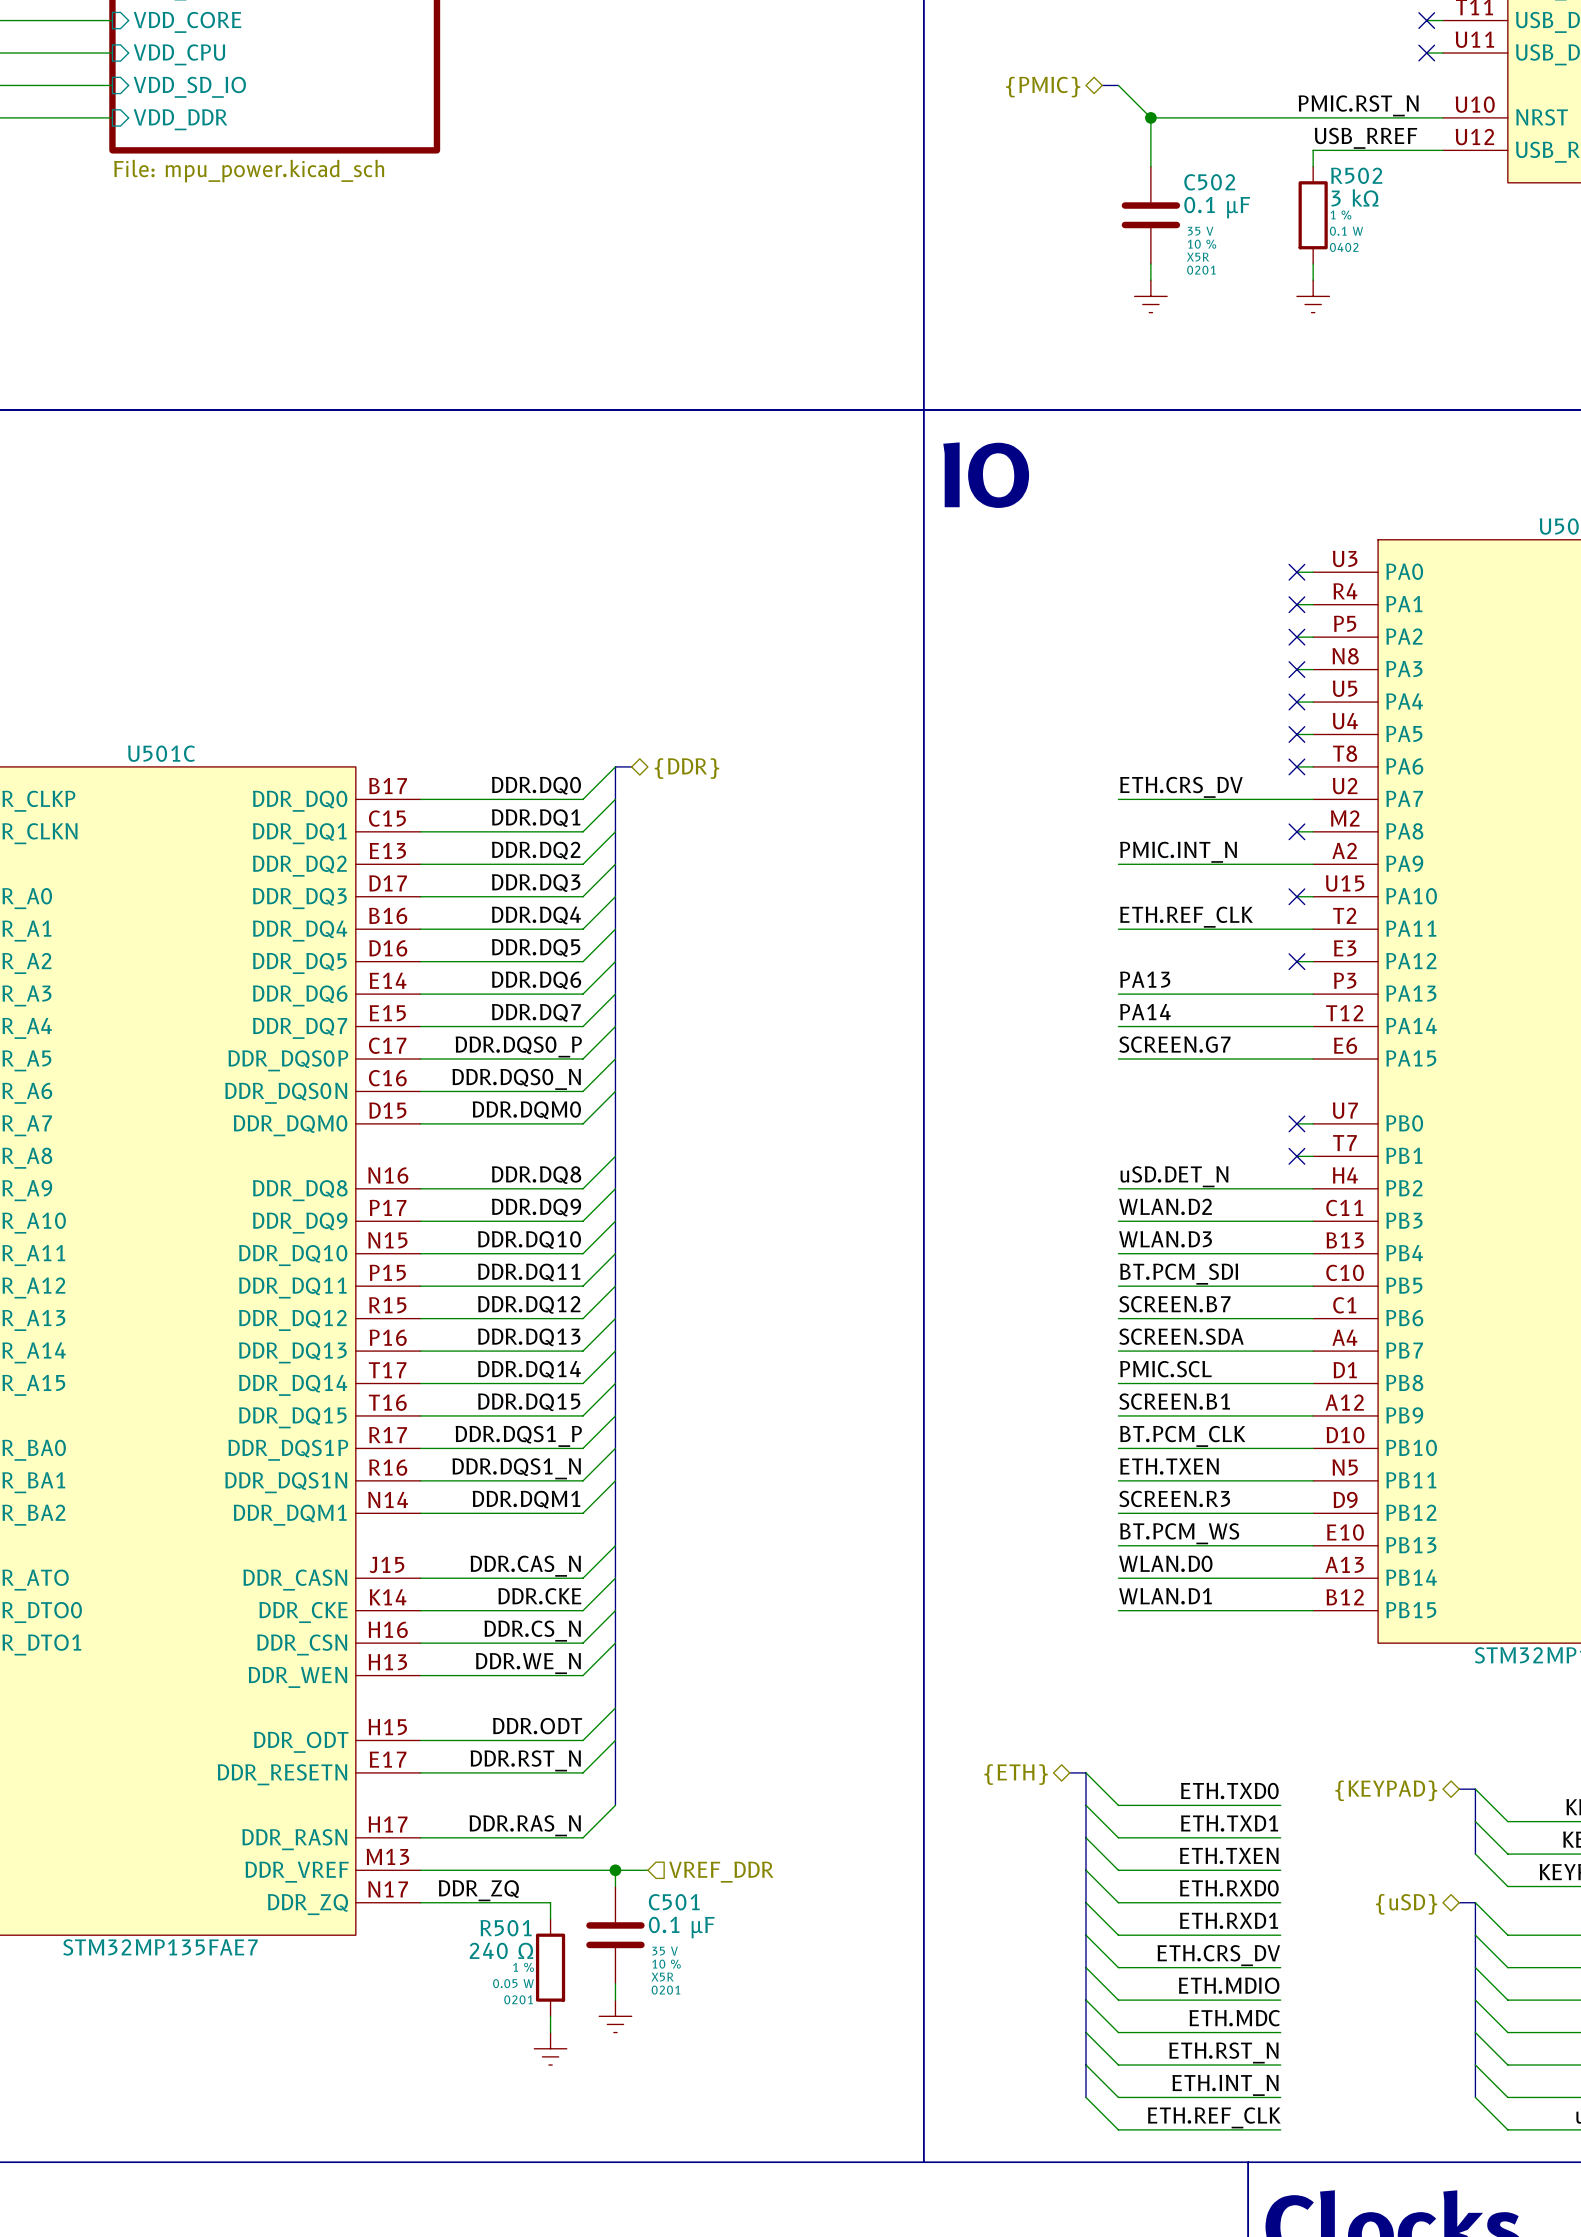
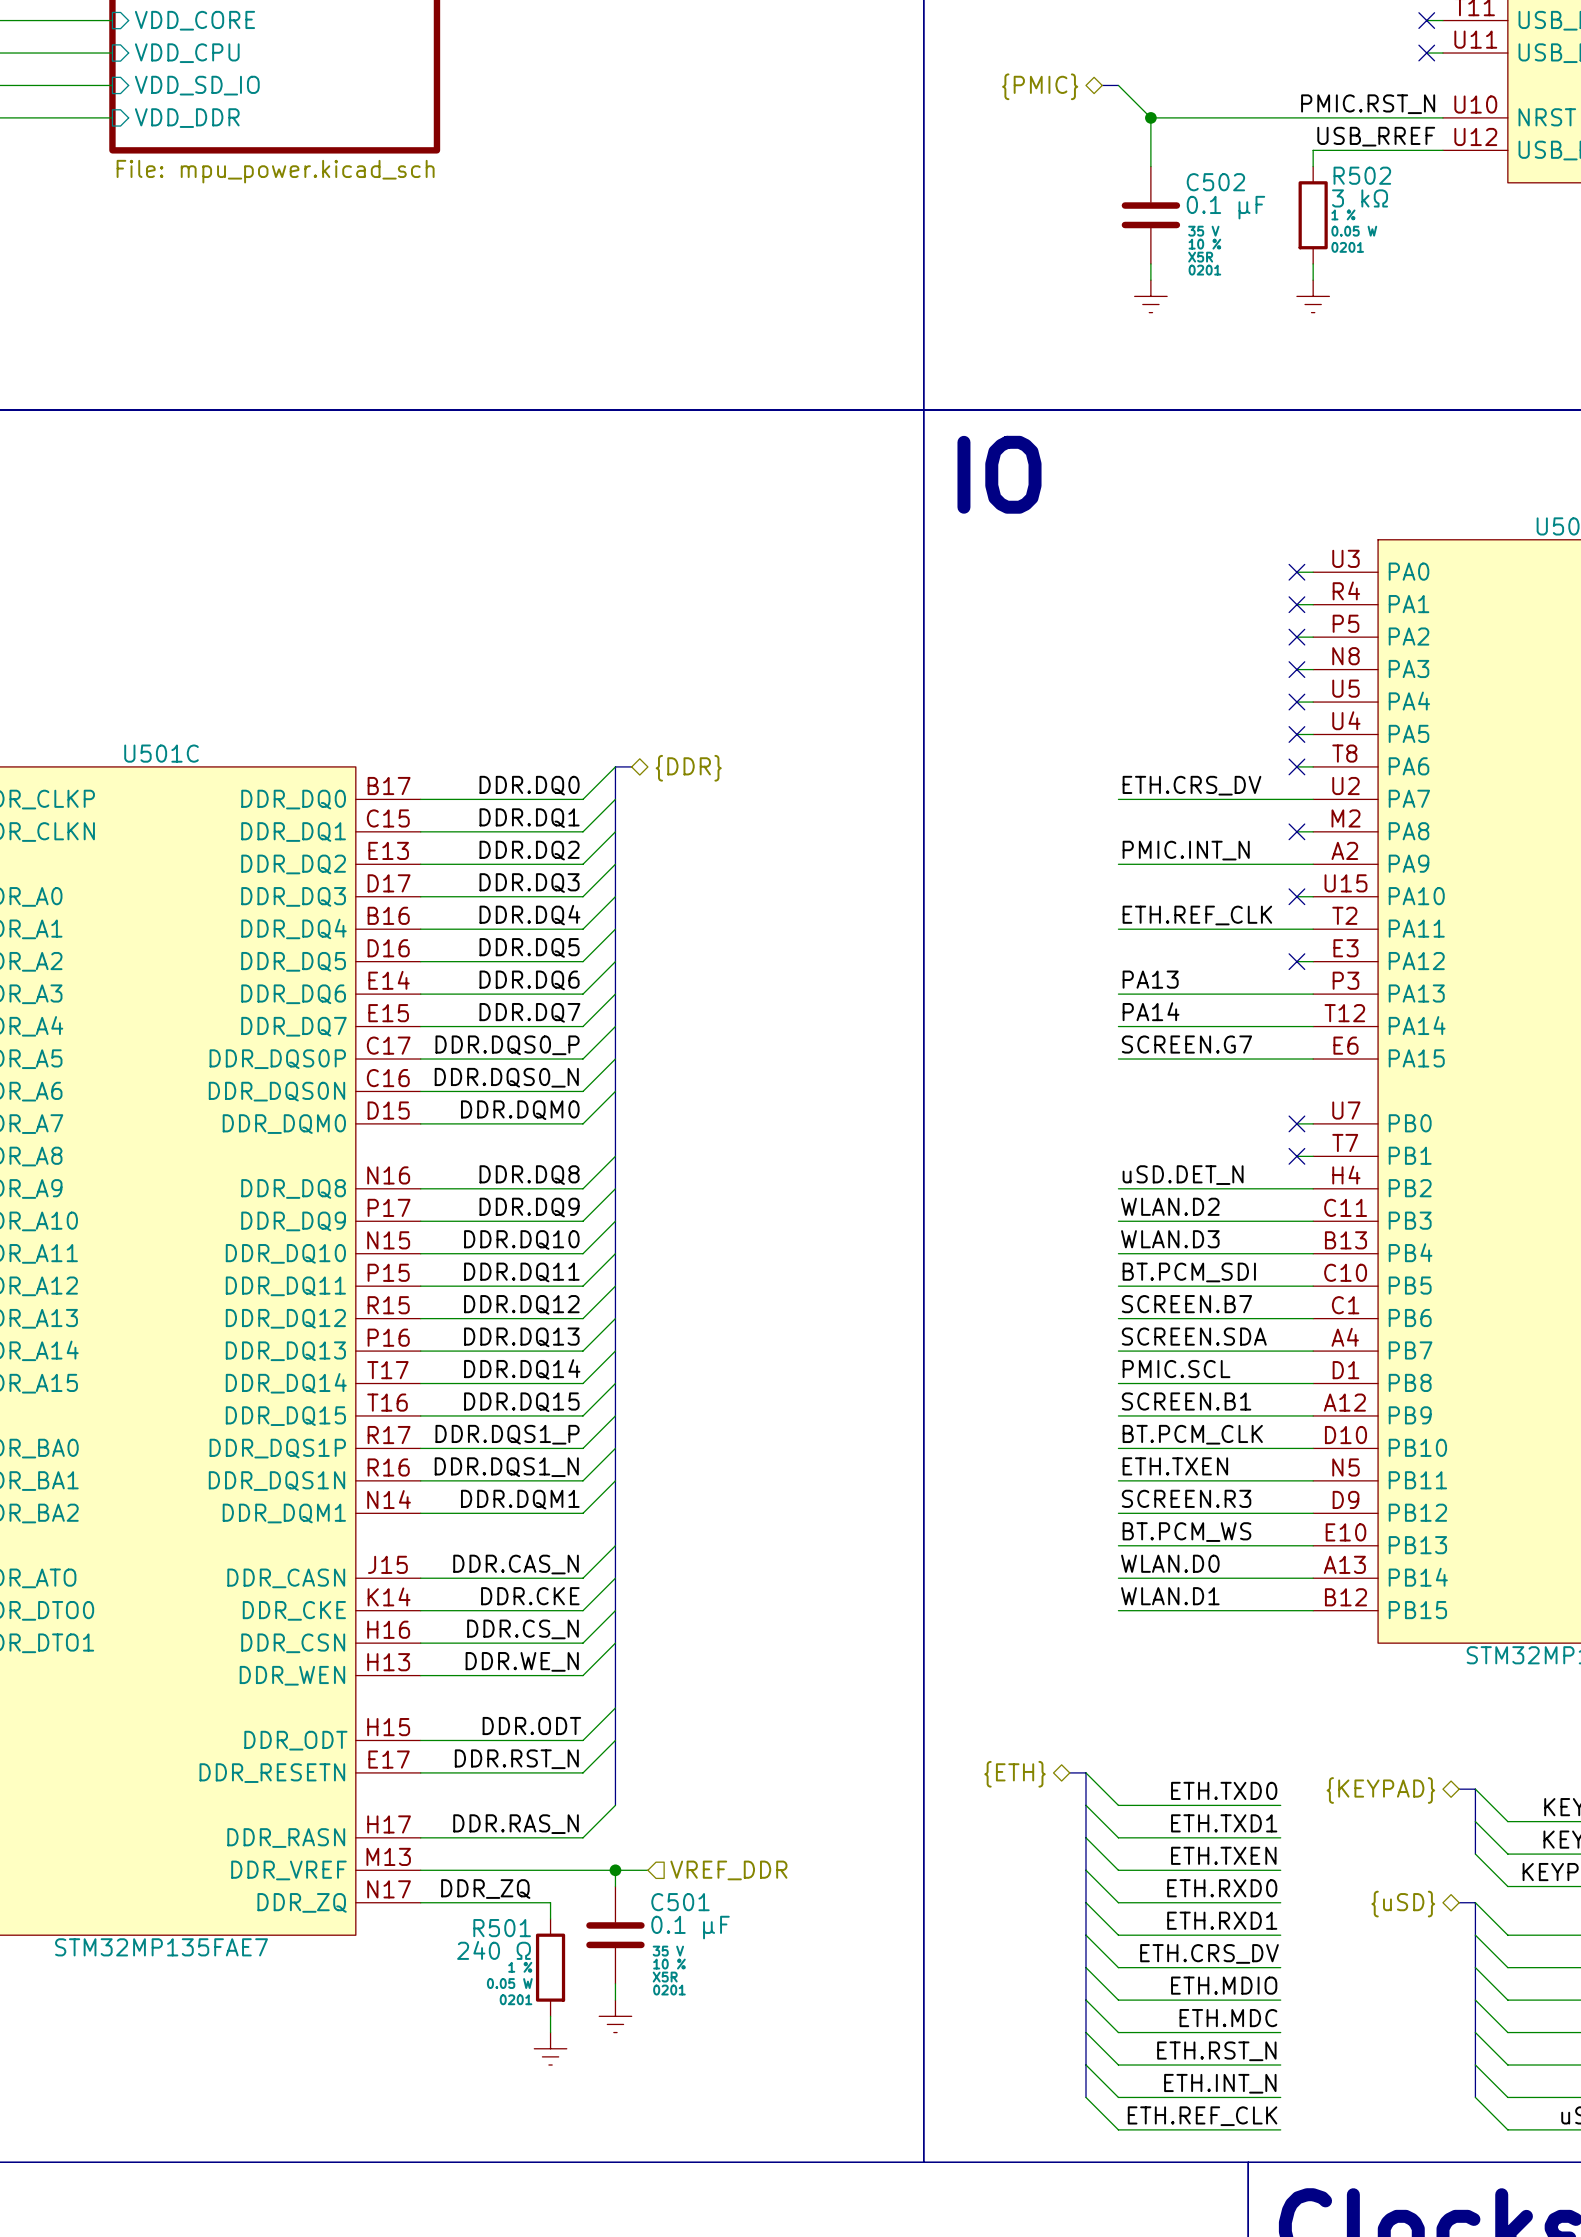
R502 text: 0.1 W (1346, 231) -> 0.05 W (1354, 231)
R502 text: 0402 (1344, 247) -> 0201 (1347, 247)

